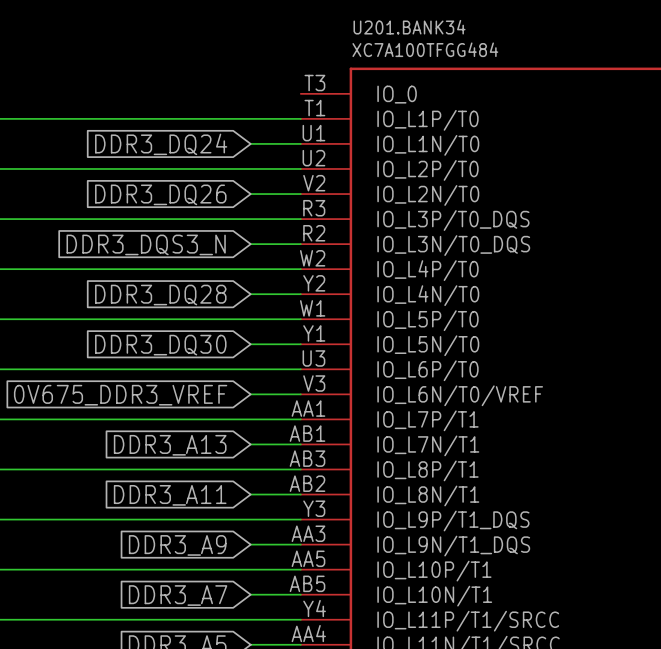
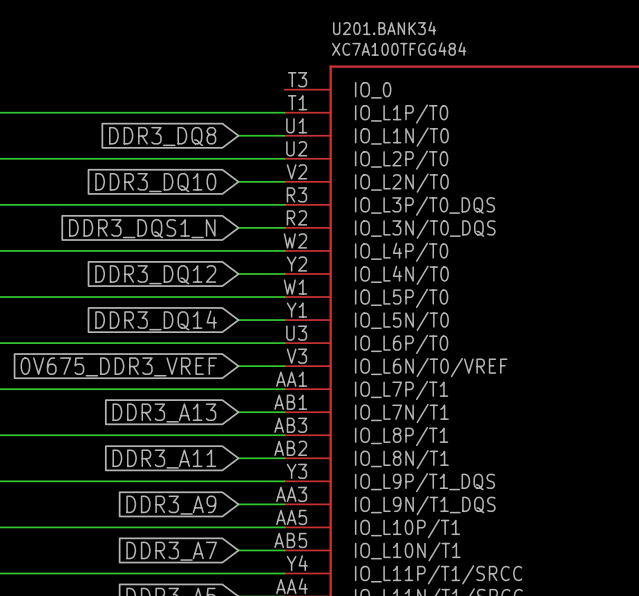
global label: DDR3_DQ24 (161, 144) -> DDR3_DQ8 (162, 136)
global label: DDR3_DQ26 (160, 194) -> DDR3_DQ10 (155, 182)
global label: DDR3_DQS3_N (146, 244) -> DDR3_DQS1_N (142, 228)
global label: DDR3_DQ28 (160, 295) -> DDR3_DQ12 (155, 274)
global label: DDR3_DQ30 (160, 345) -> DDR3_DQ14 (156, 320)

